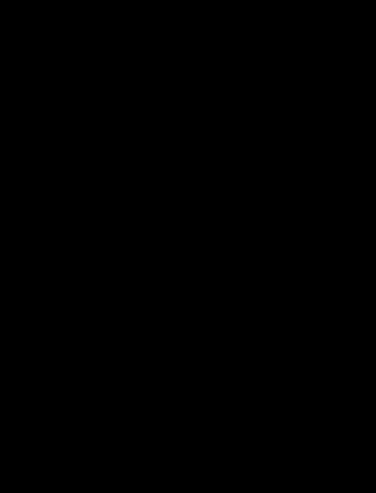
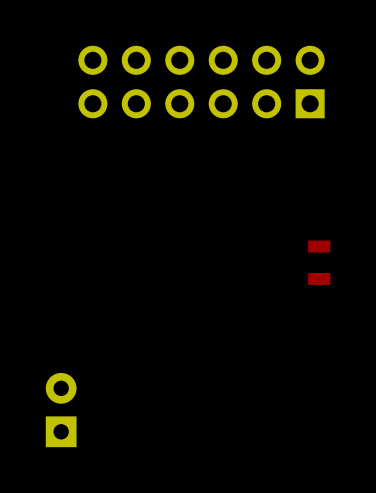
part: none -> (201, 82)
part: none -> (319, 262)
part: none -> (61, 410)

